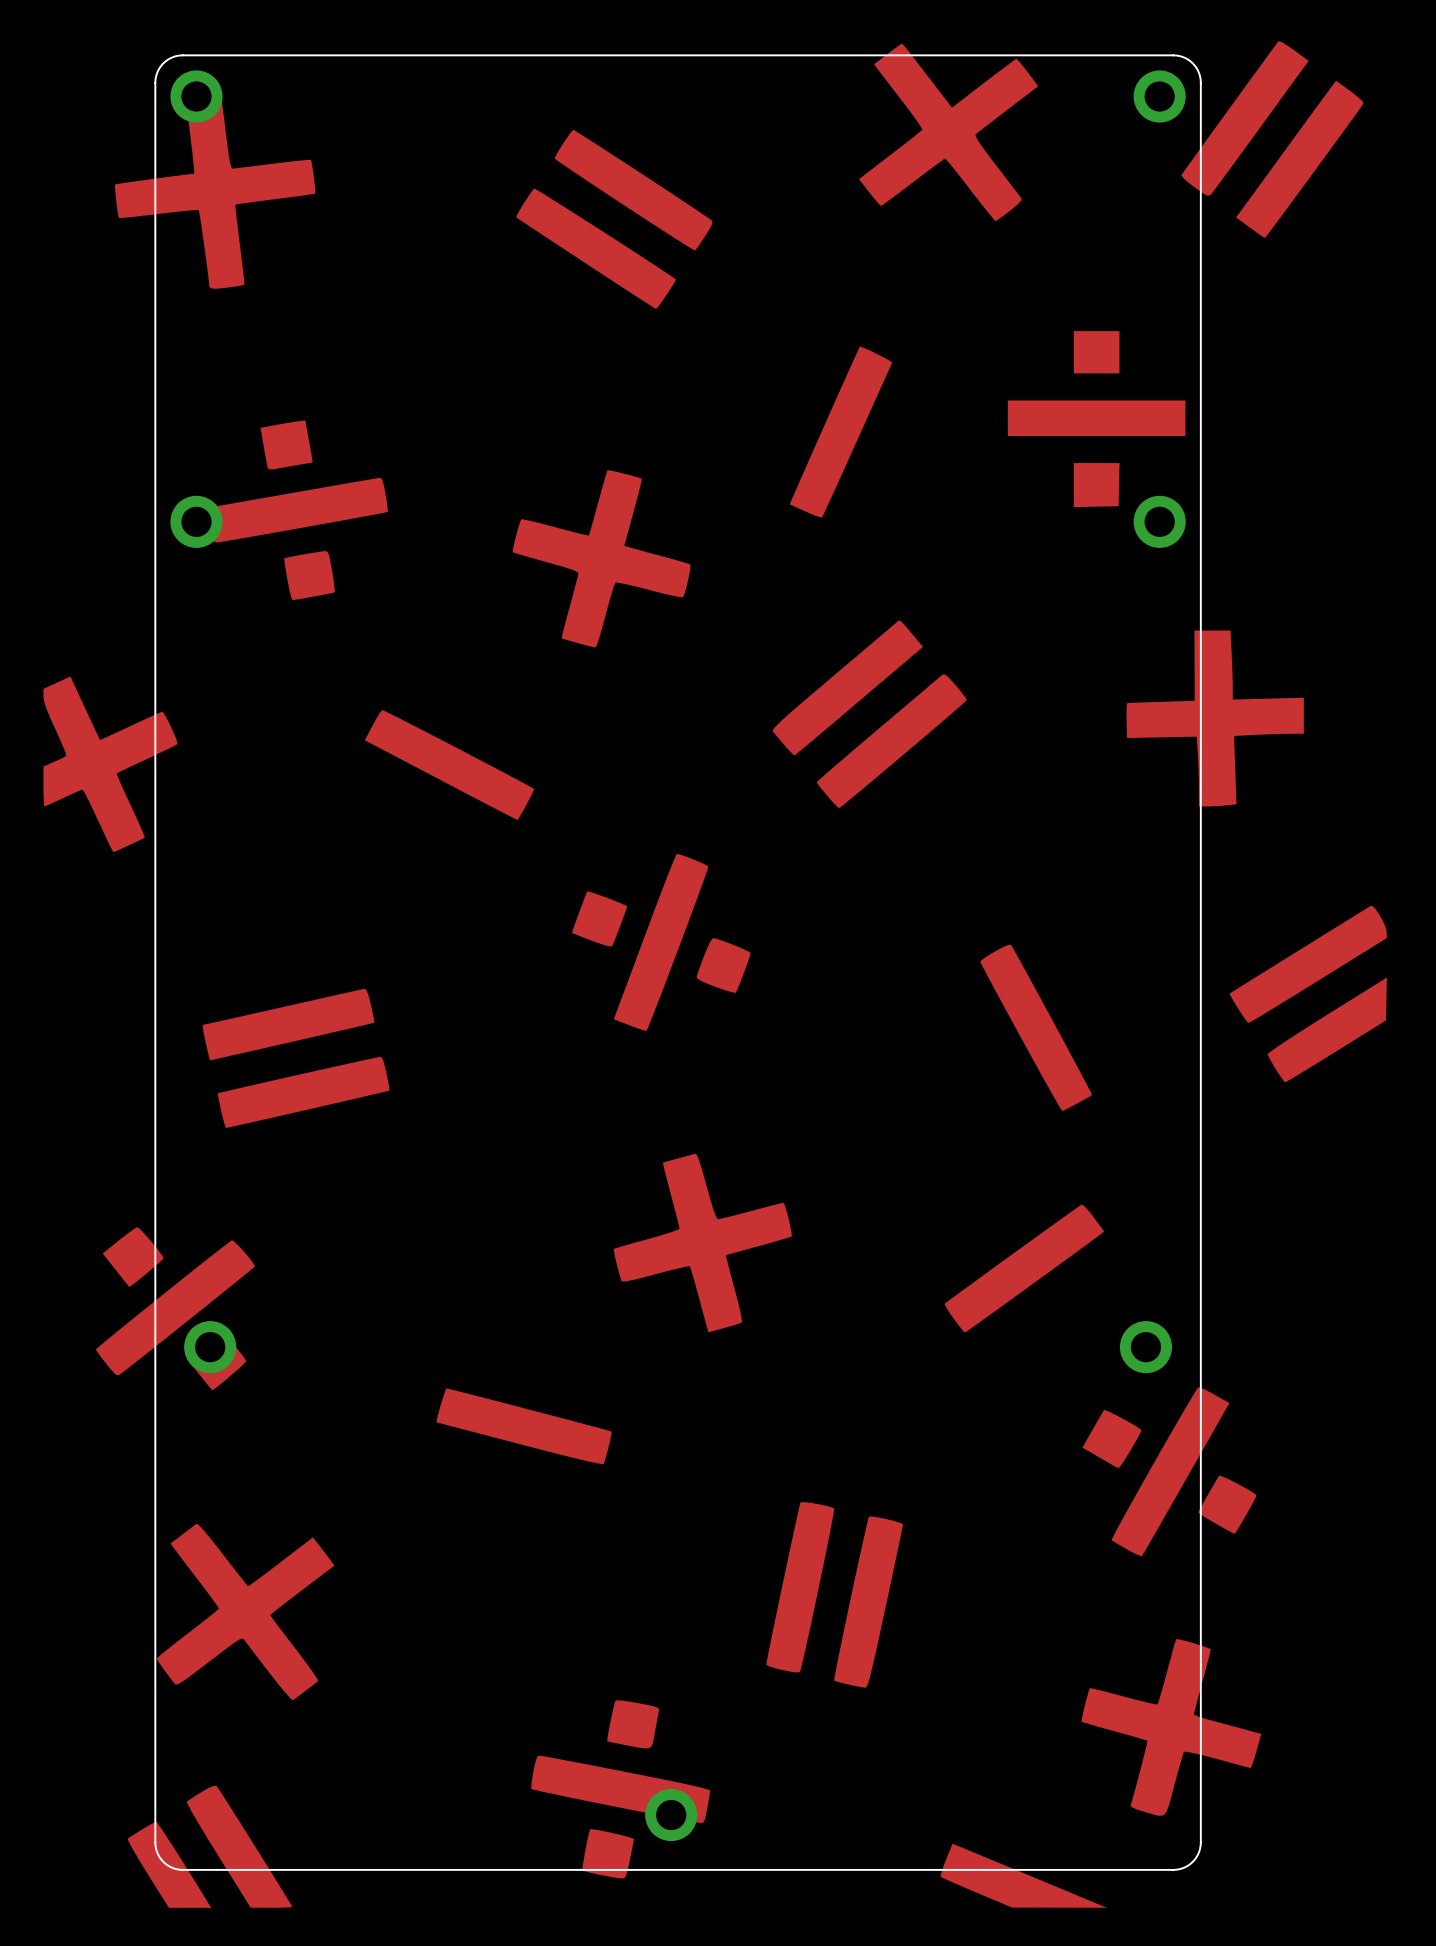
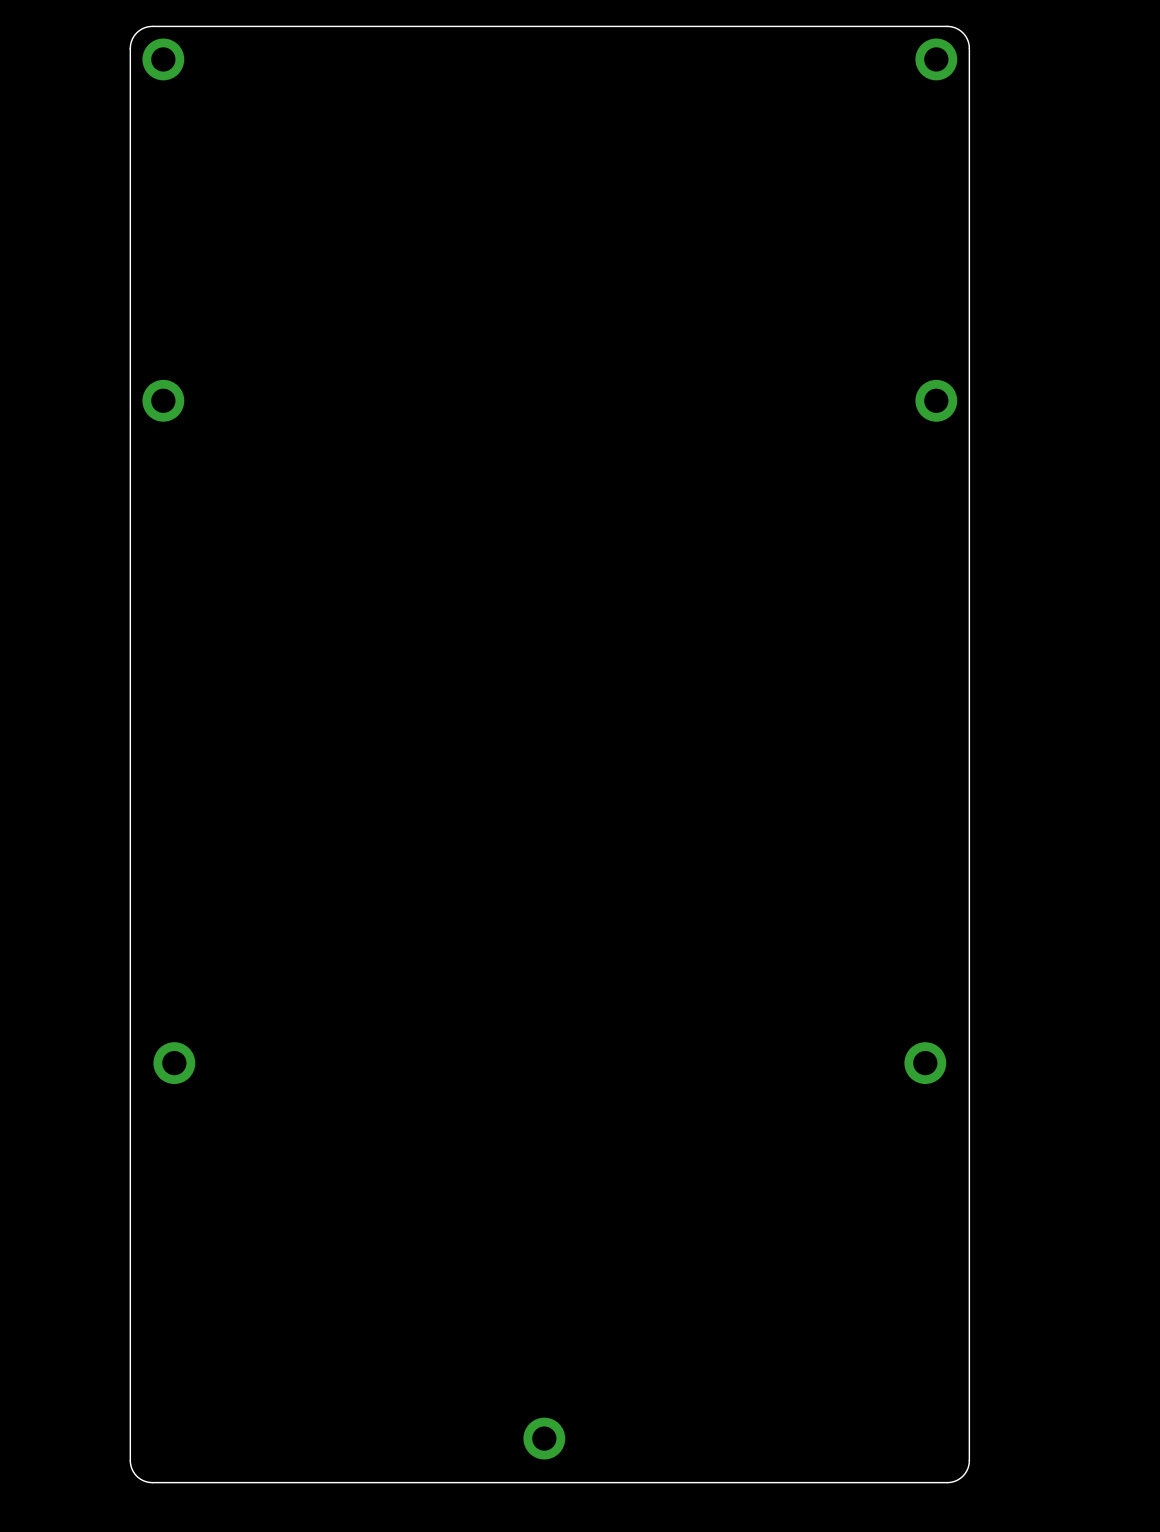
drawing: [43, 41, 1387, 1908] -> none

